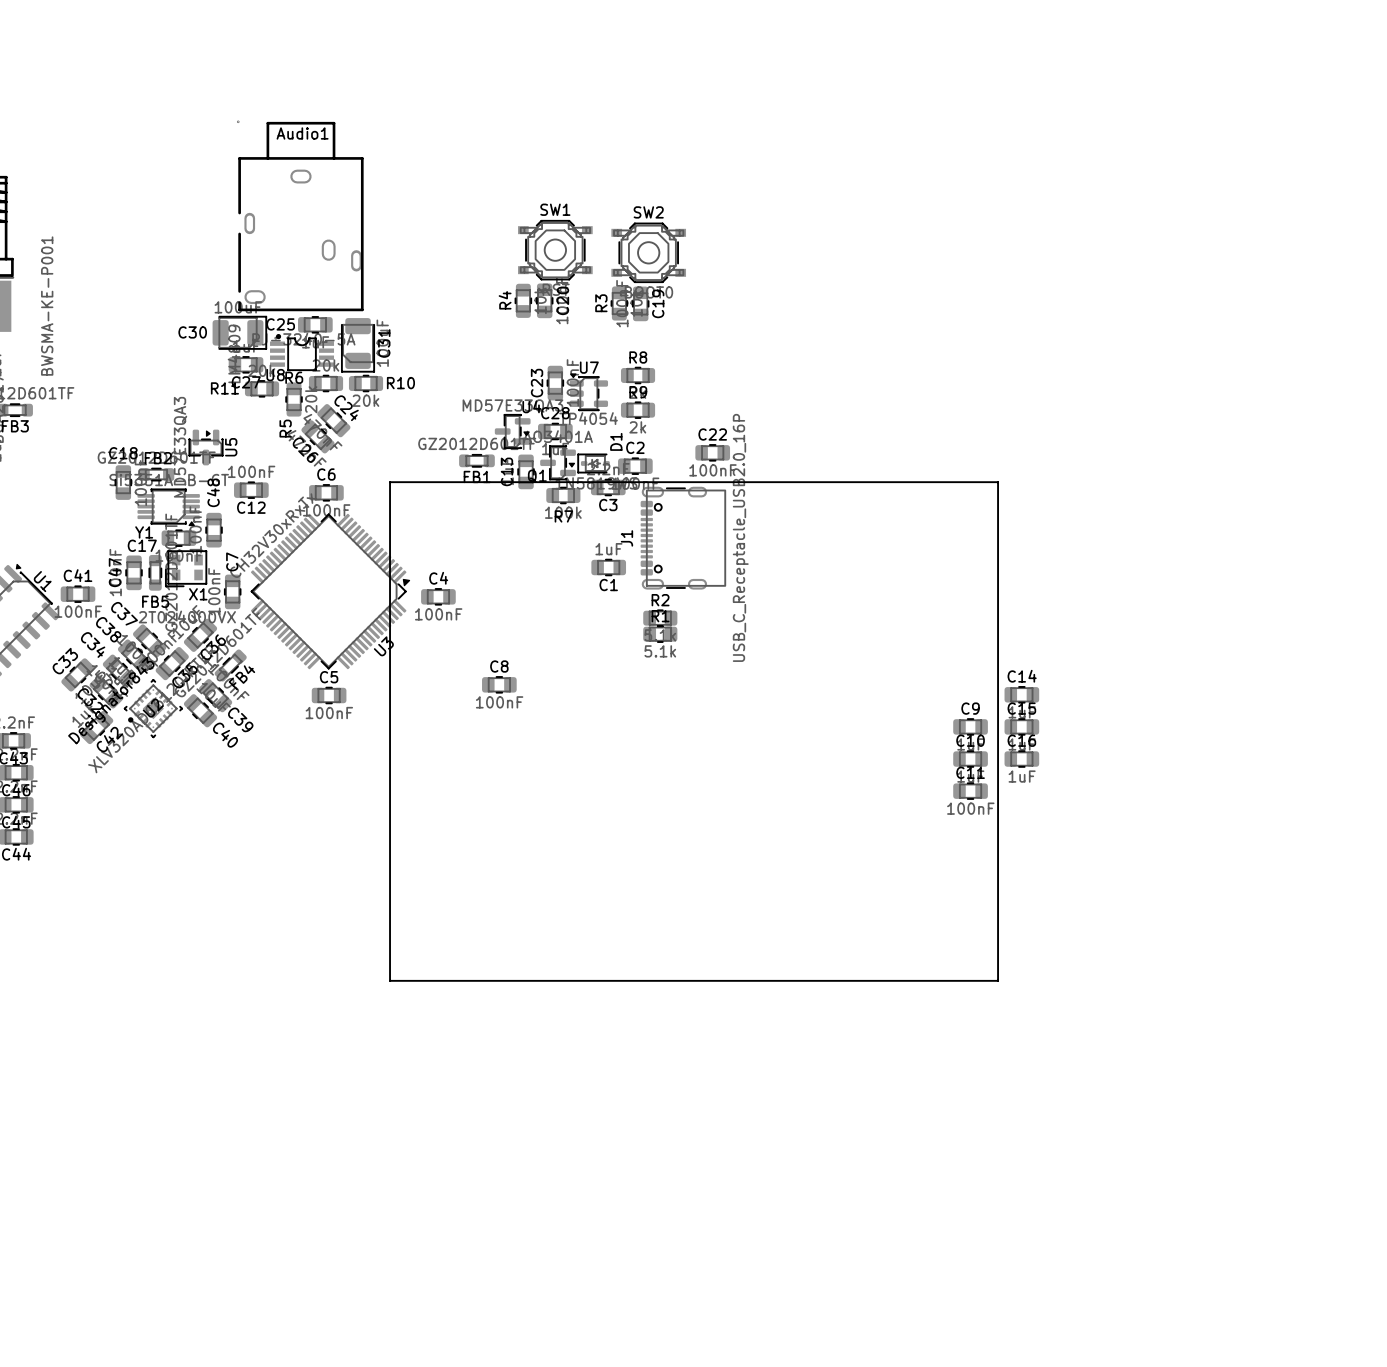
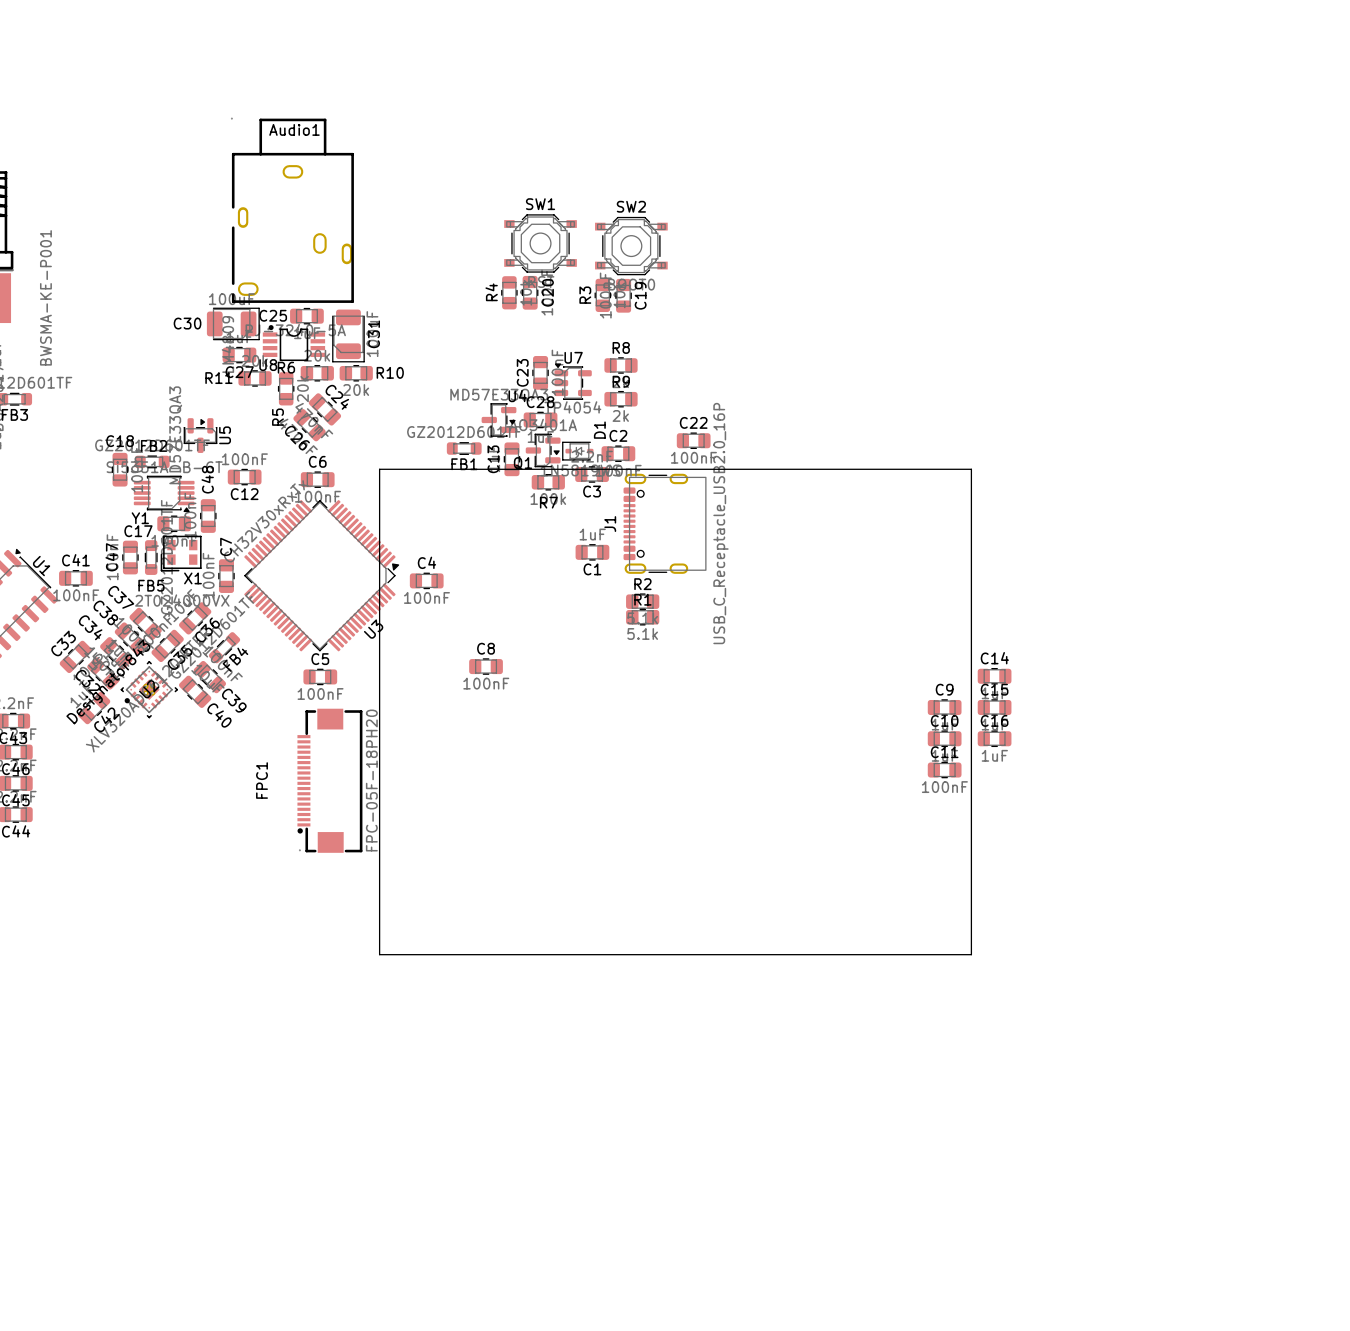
FPC1: none -> FPC-05F-18PH20 (329, 780)

